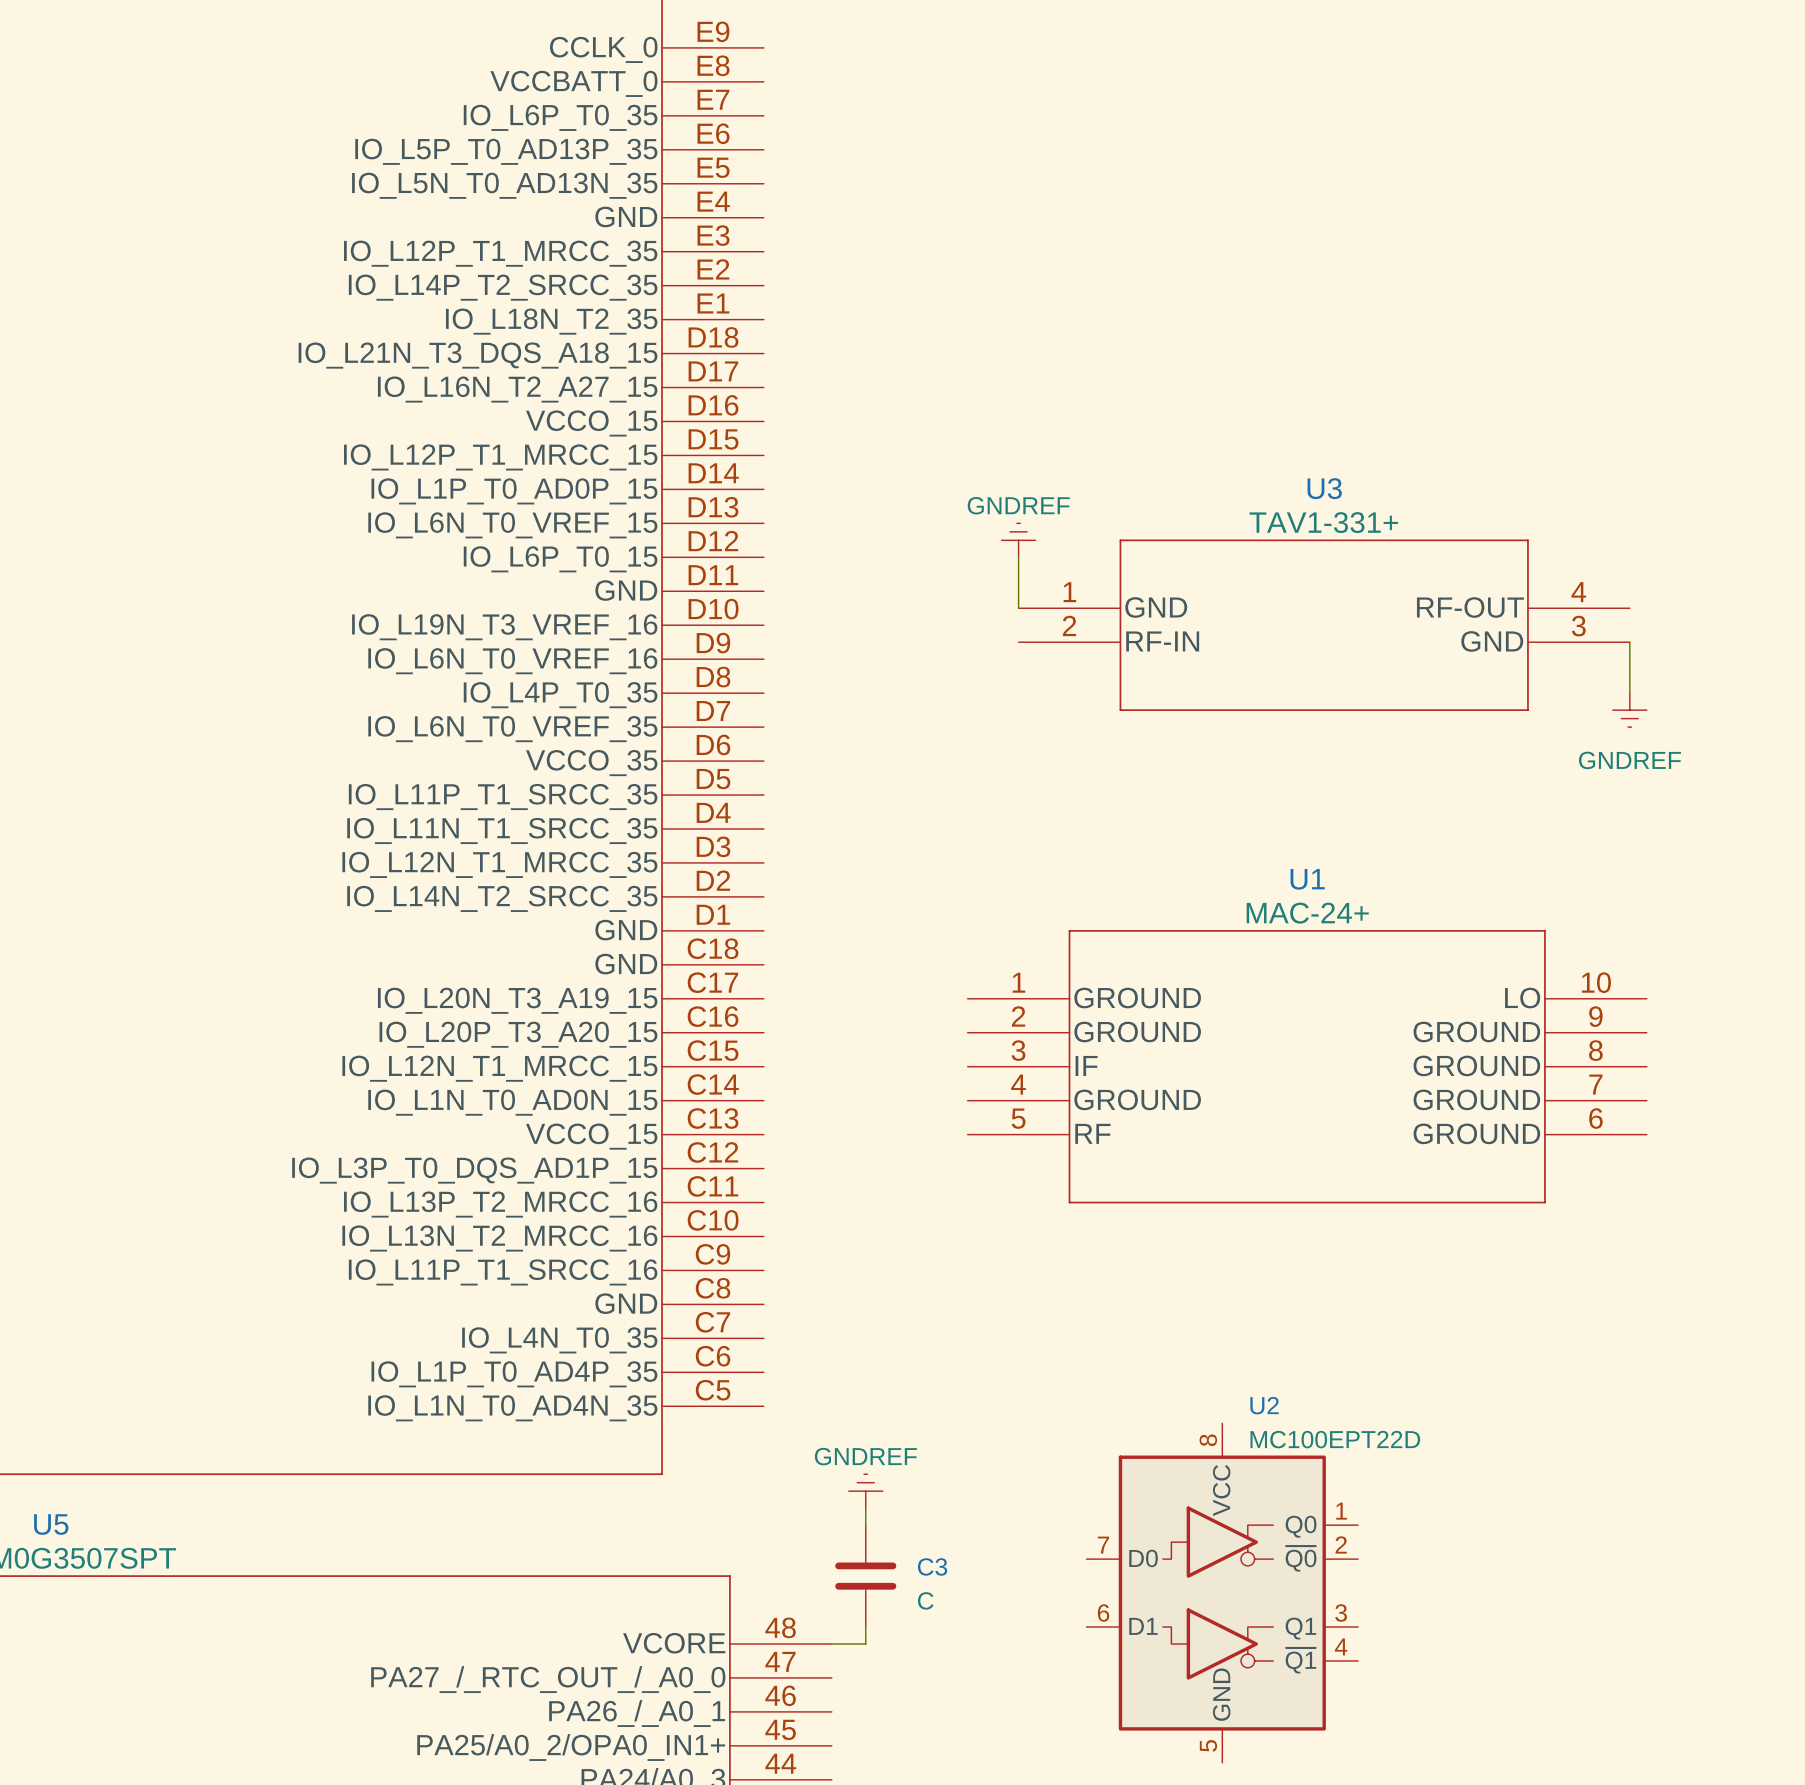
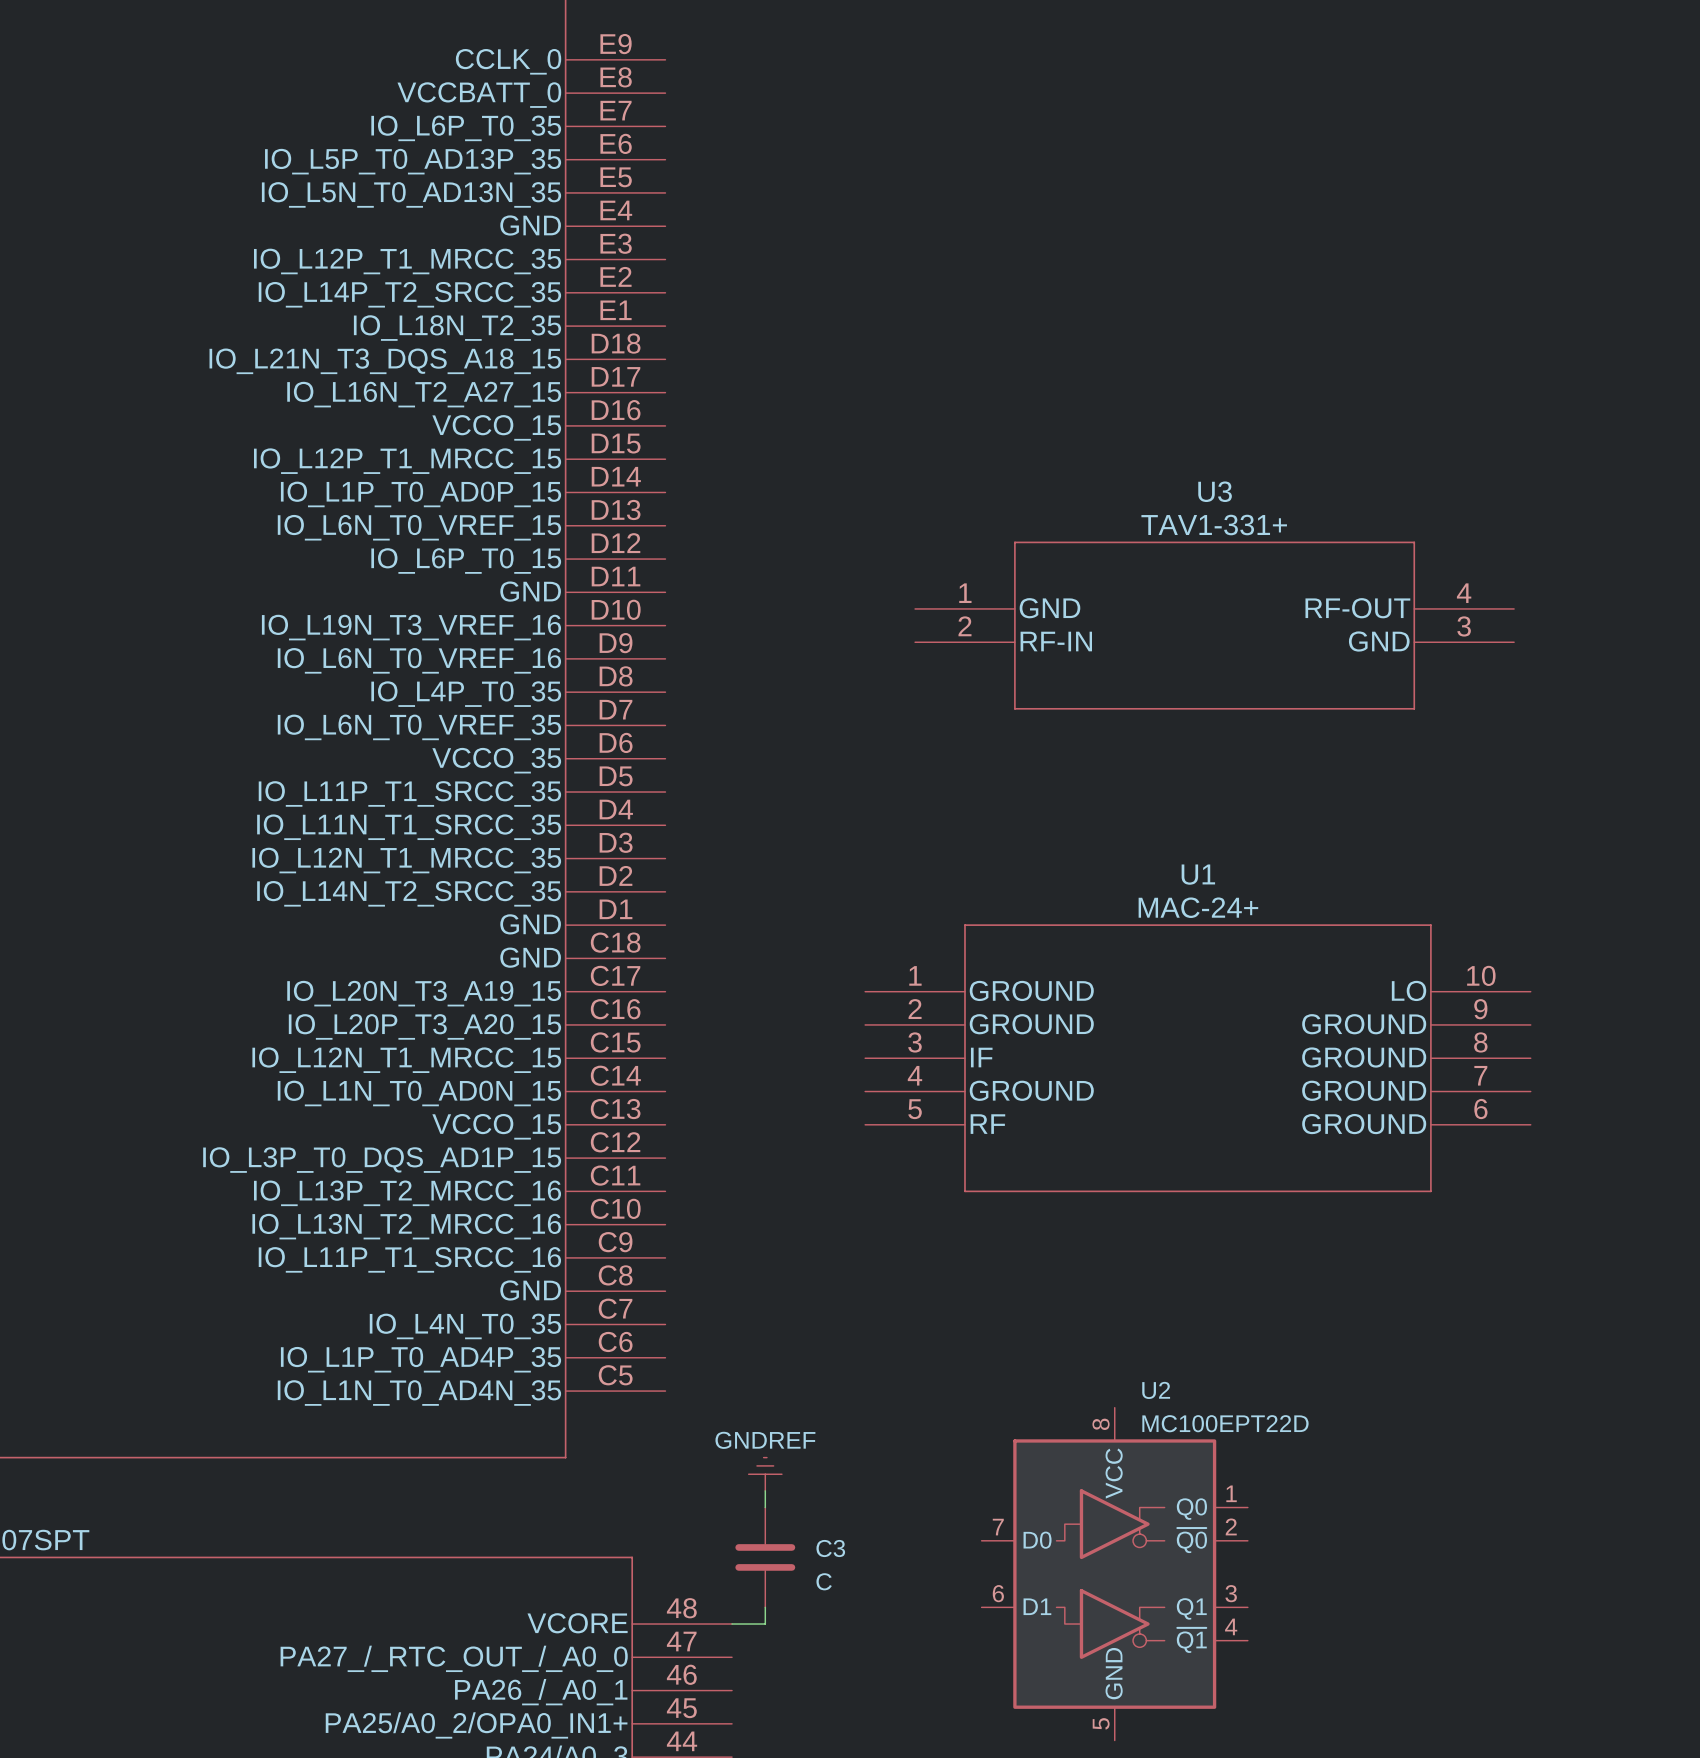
power symbol: GNDREF (1018, 540) -> none
wire: (1018, 557) (1018, 608) -> none
wire: (1629, 642) (1629, 693) -> none
power symbol: GNDREF (1629, 710) -> none

